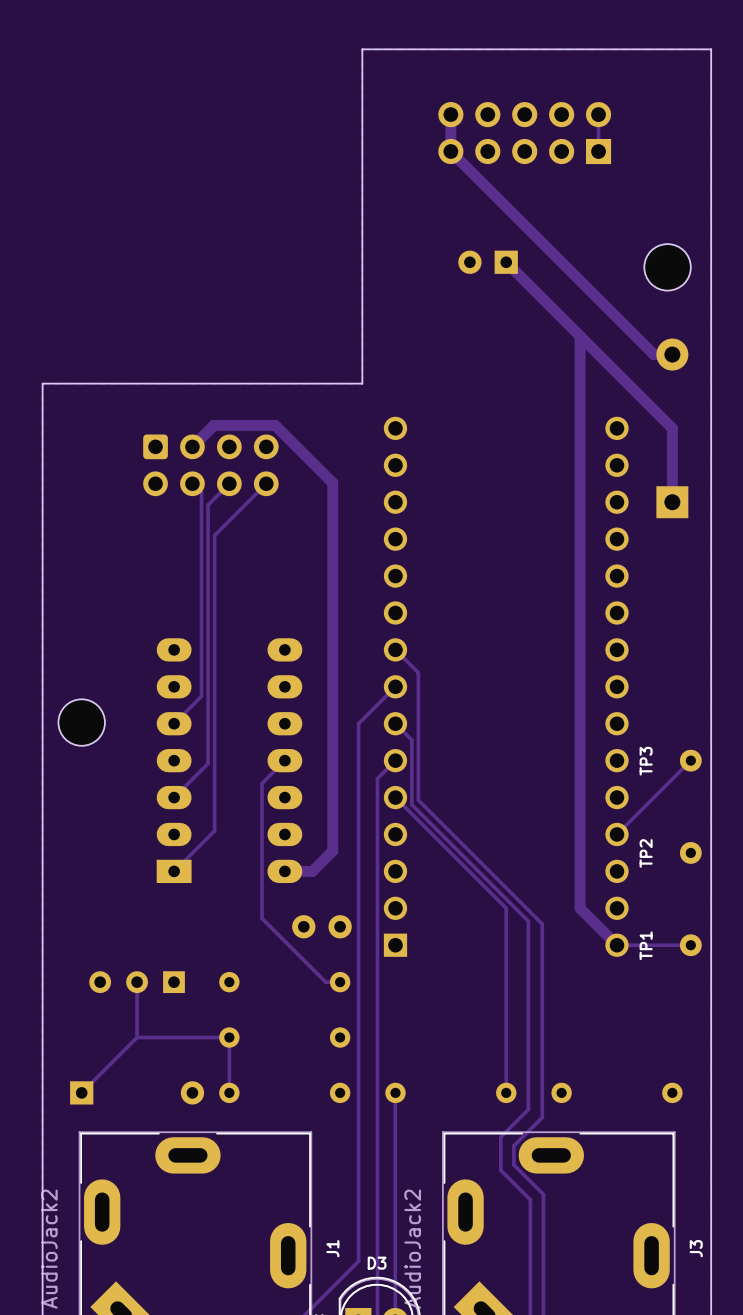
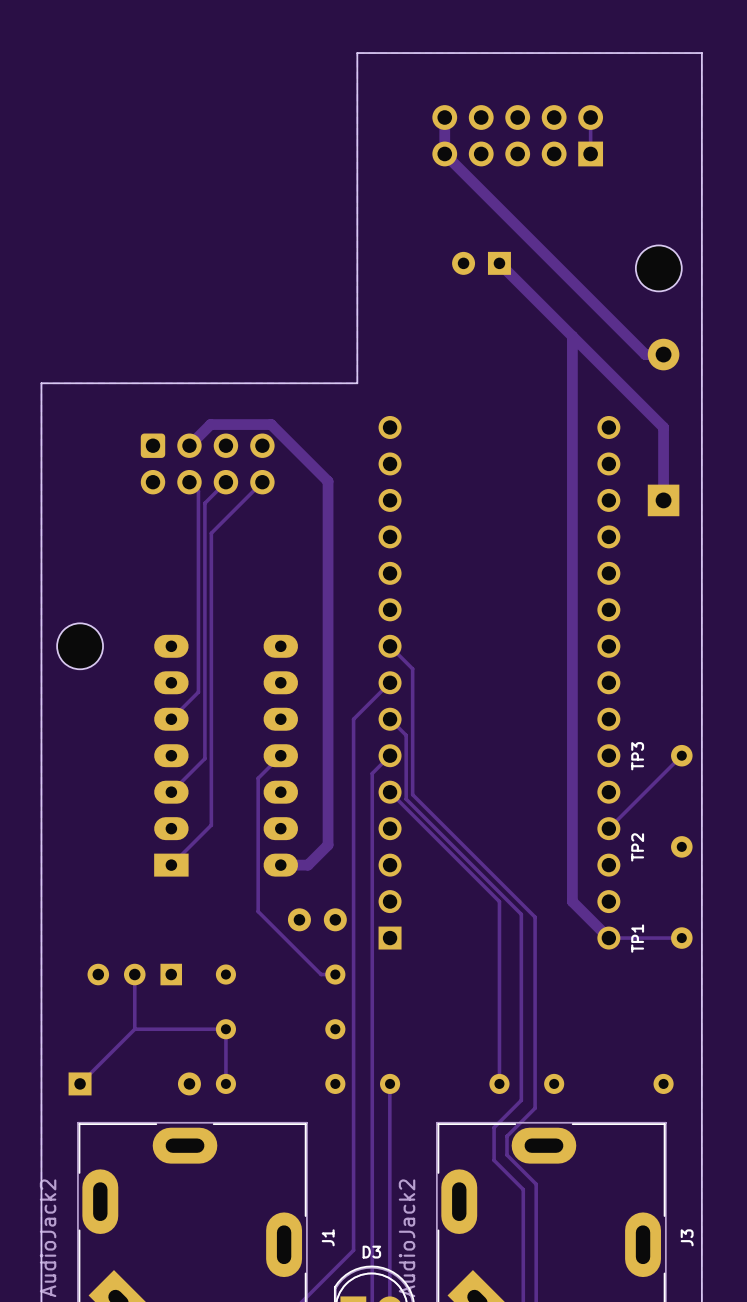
part position: (81, 722) -> (80, 646)

